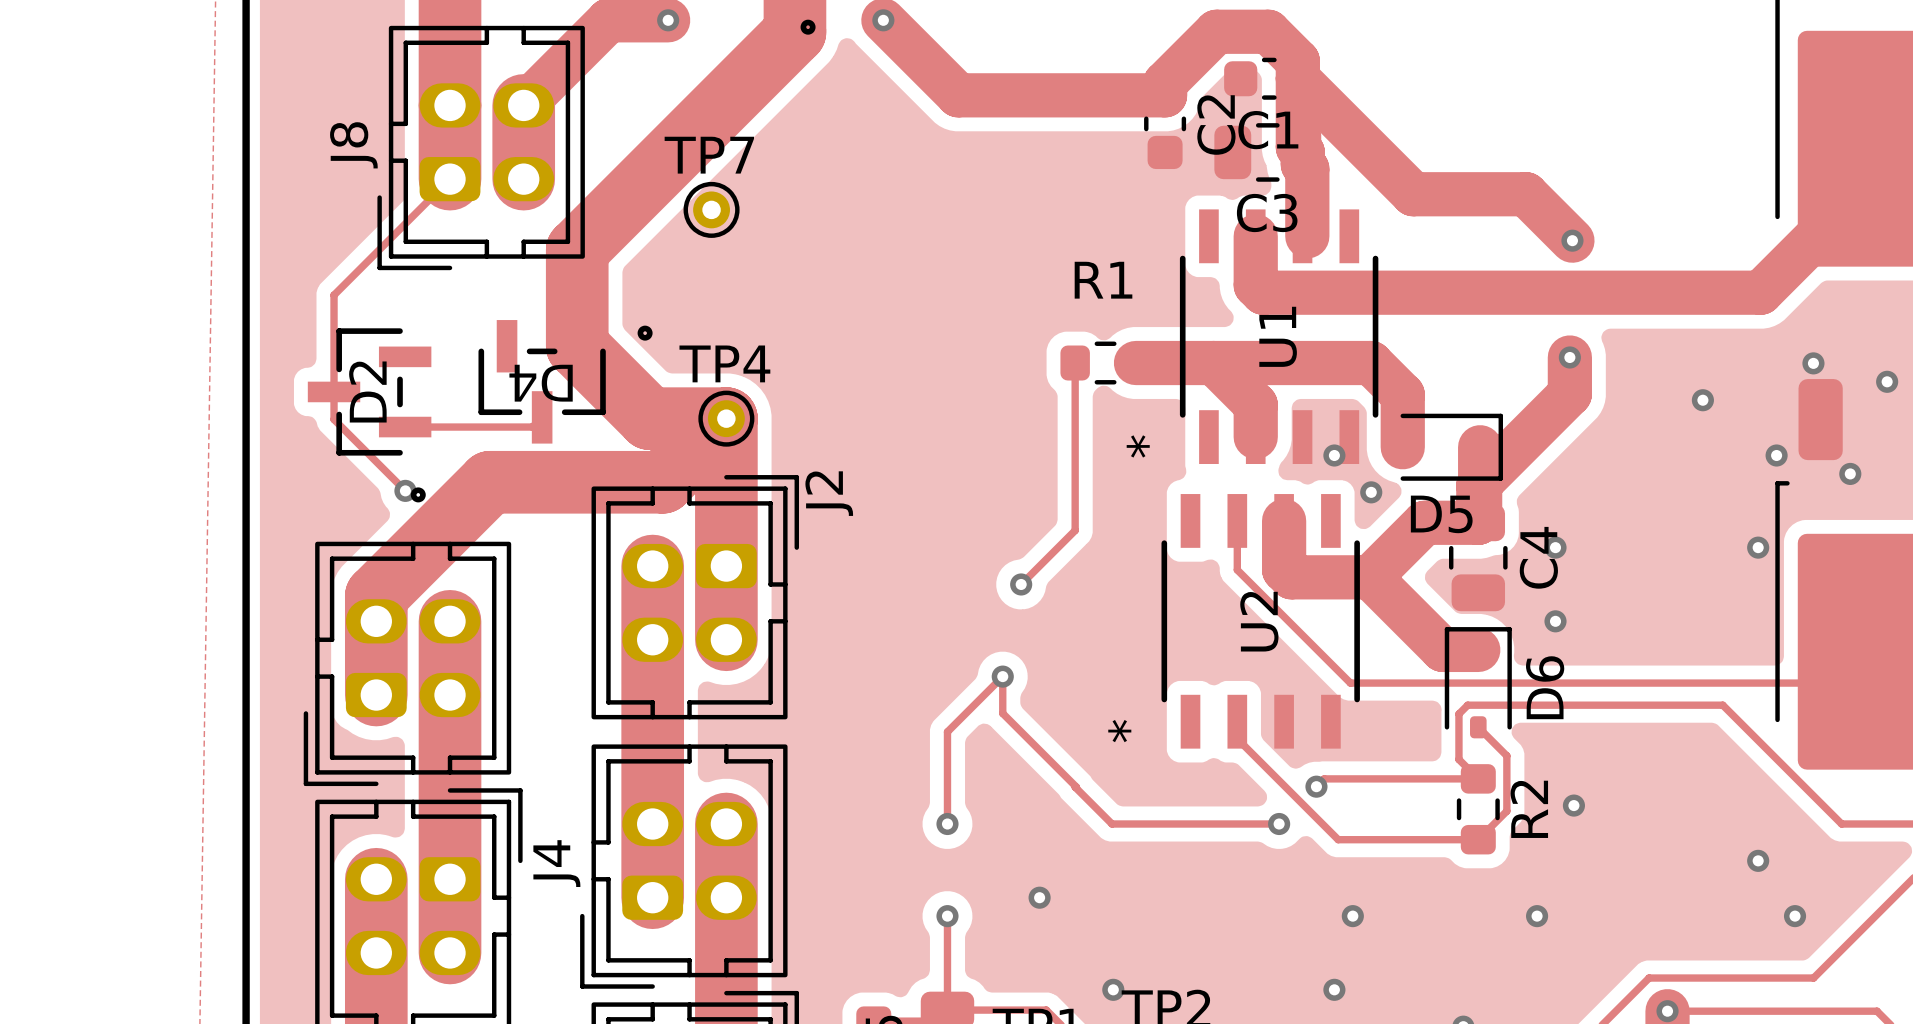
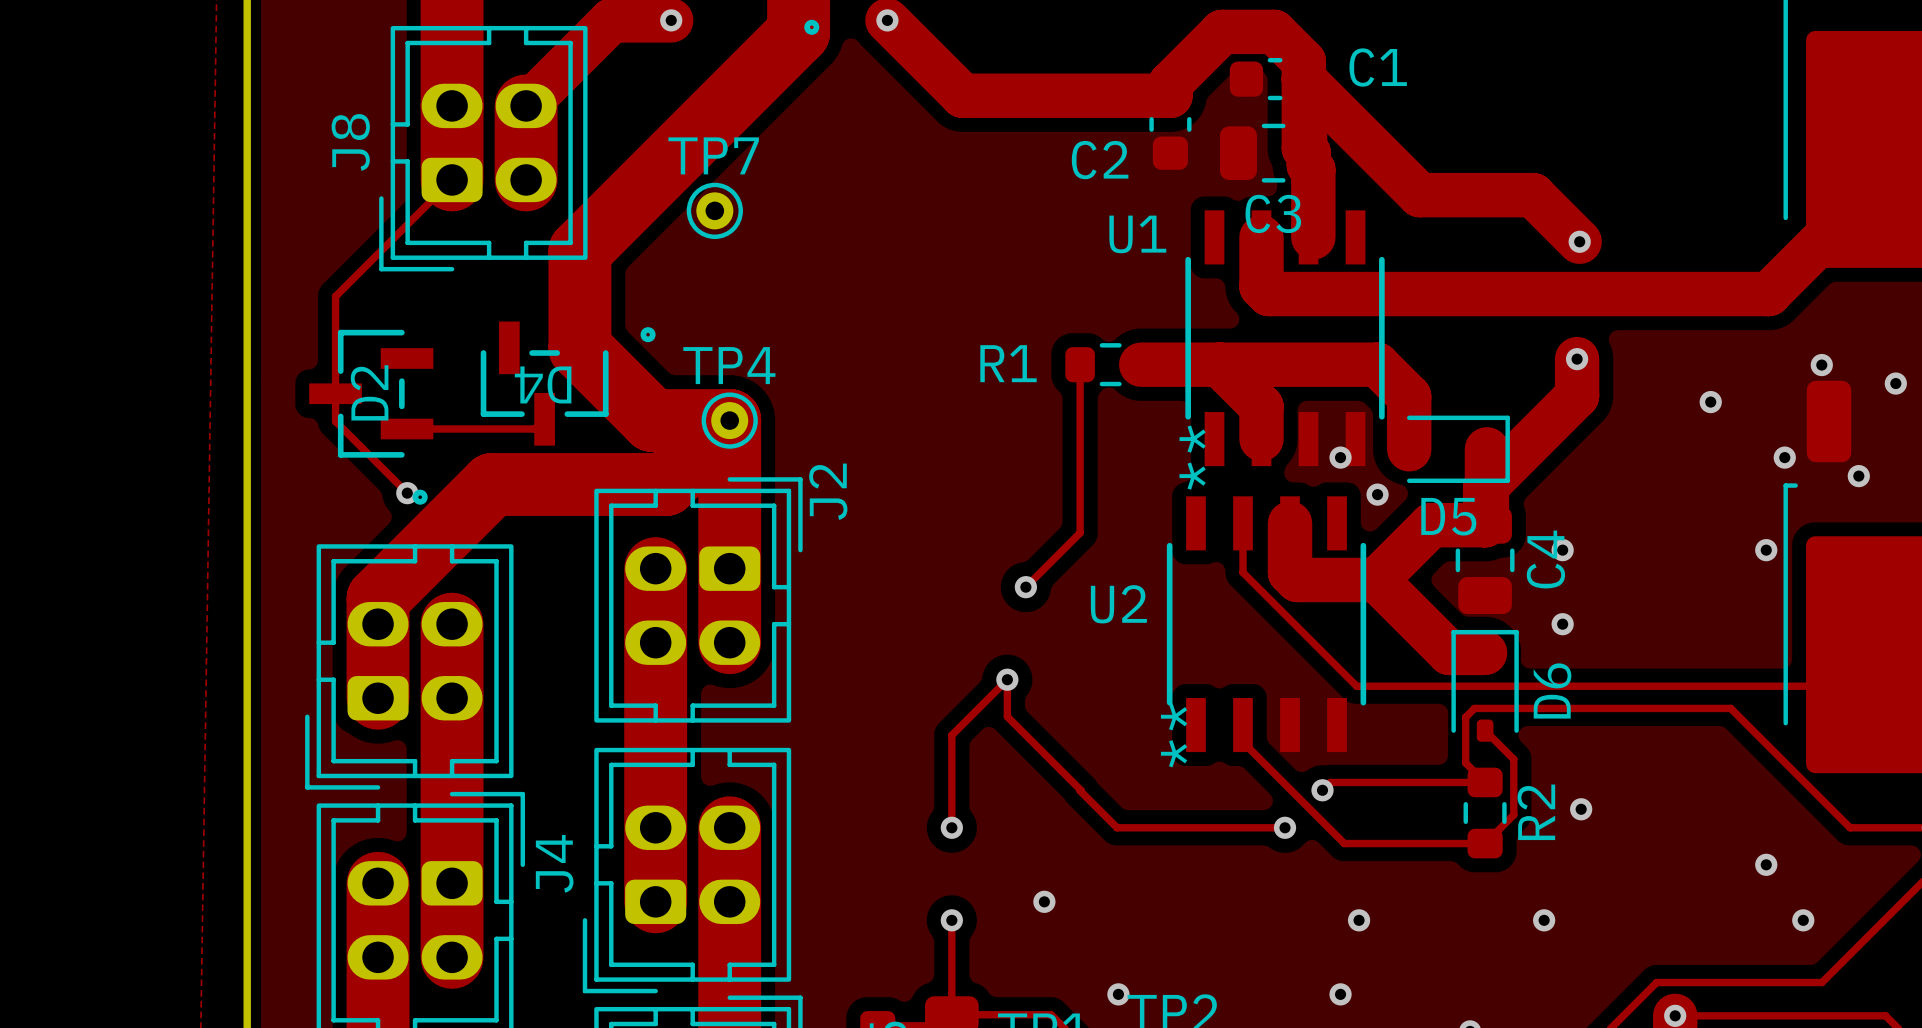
C2 name rotation: 0° (1216, 125) -> 90° clockwise (1100, 160)
C2 name position: C2 (1216, 125) -> C2 (1100, 160)
C1 name position: C1 (1268, 130) -> C1 (1378, 67)
R1 name position: R1 (1103, 280) -> R1 (1008, 363)
U1 name rotation: 0° (1278, 336) -> 90° clockwise (1137, 234)
U1 name position: U1 (1278, 336) -> U1 (1137, 234)
U1 text position: * (1138, 446) -> * (1192, 439)
U1 text: none -> * (1192, 476)
U2 name rotation: 0° (1259, 621) -> 90° clockwise (1118, 604)
U2 name position: U2 (1259, 621) -> U2 (1118, 604)
U2 text position: * (1119, 731) -> * (1174, 716)
U2 text: none -> * (1174, 753)

